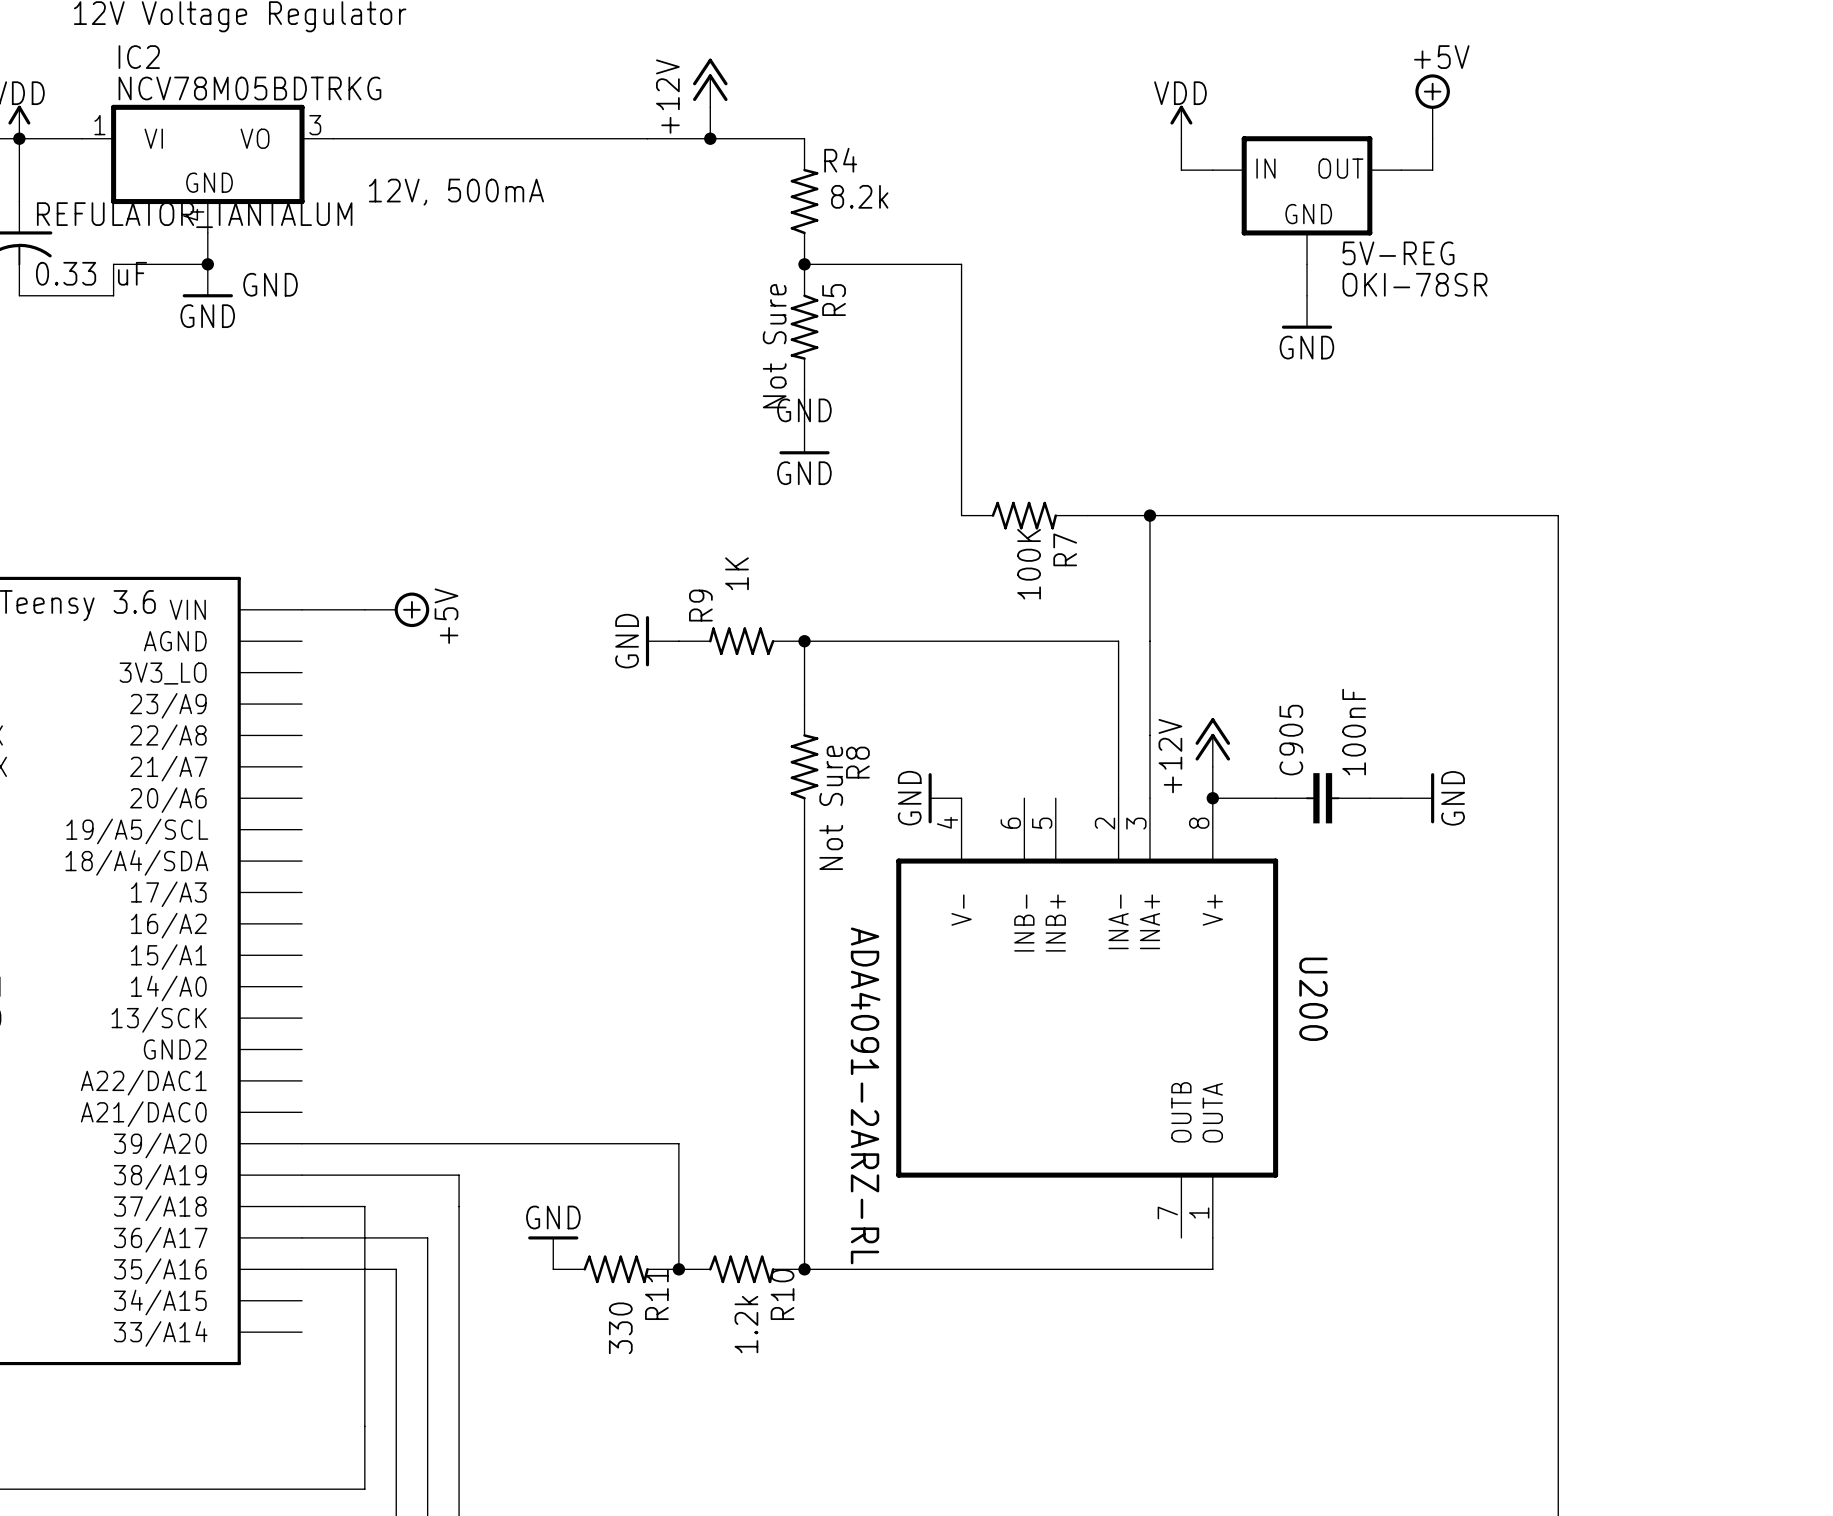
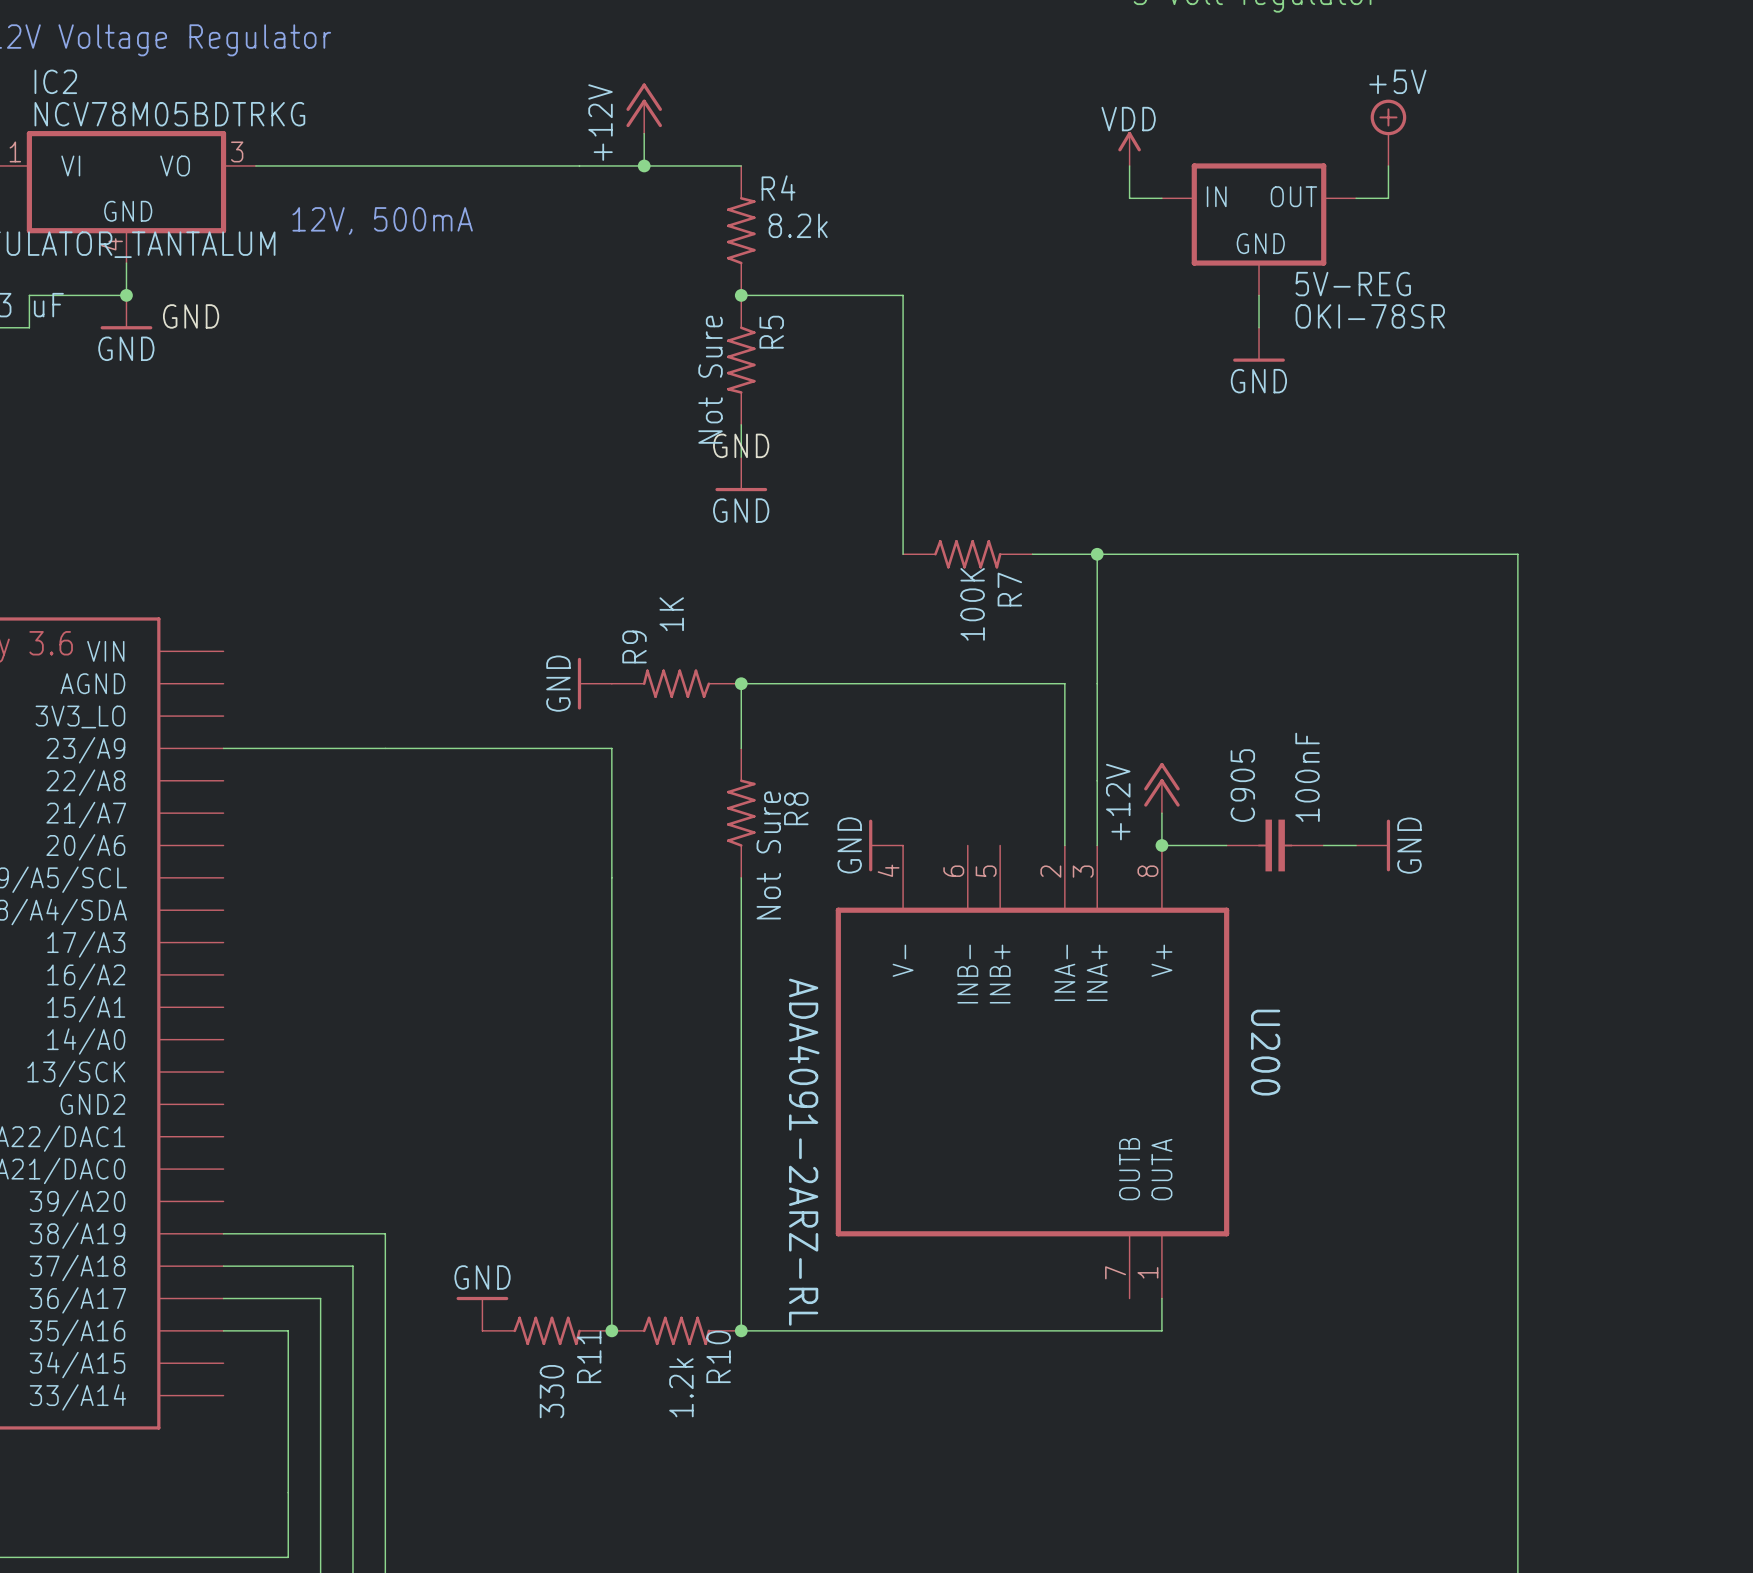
wire: (302, 609) (364, 609) -> none
power symbol: +5V (397, 609) -> none
wire: (302, 1143) (678, 1143) -> (223, 748) (611, 748) (611, 1201)
wire: (364, 1206) (364, 1269) (396, 1269) -> (320, 1298) (320, 1330)
wire: (396, 1237) (427, 1237) -> (288, 1266) (352, 1266) (352, 1298)

